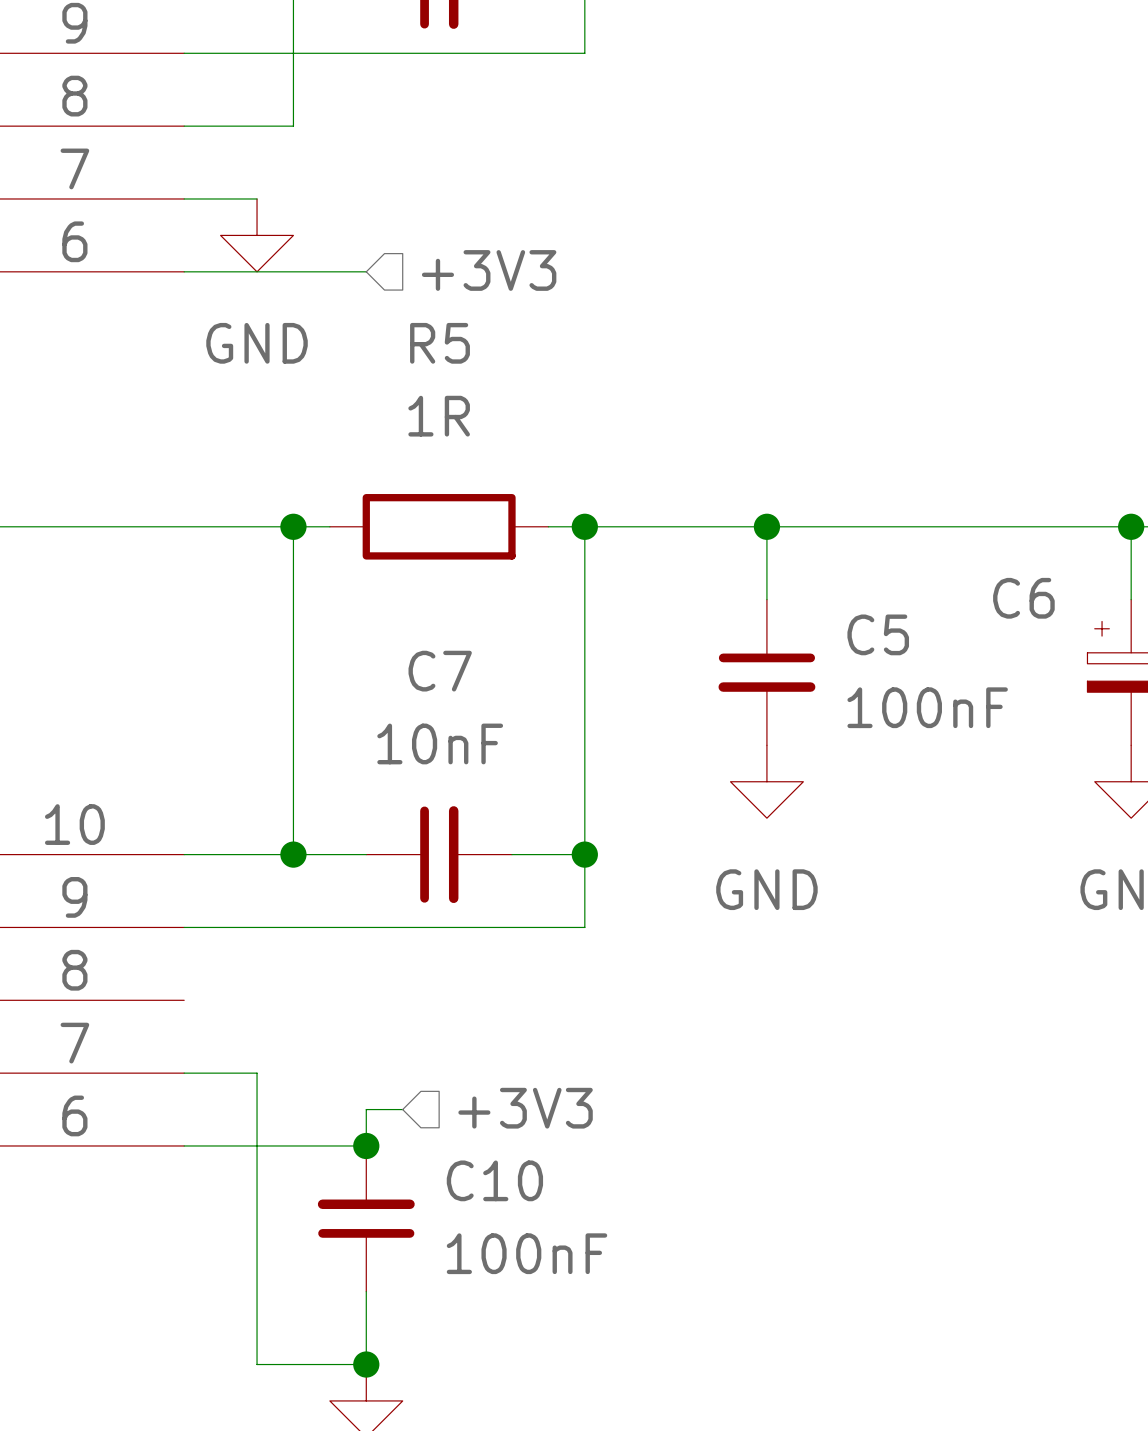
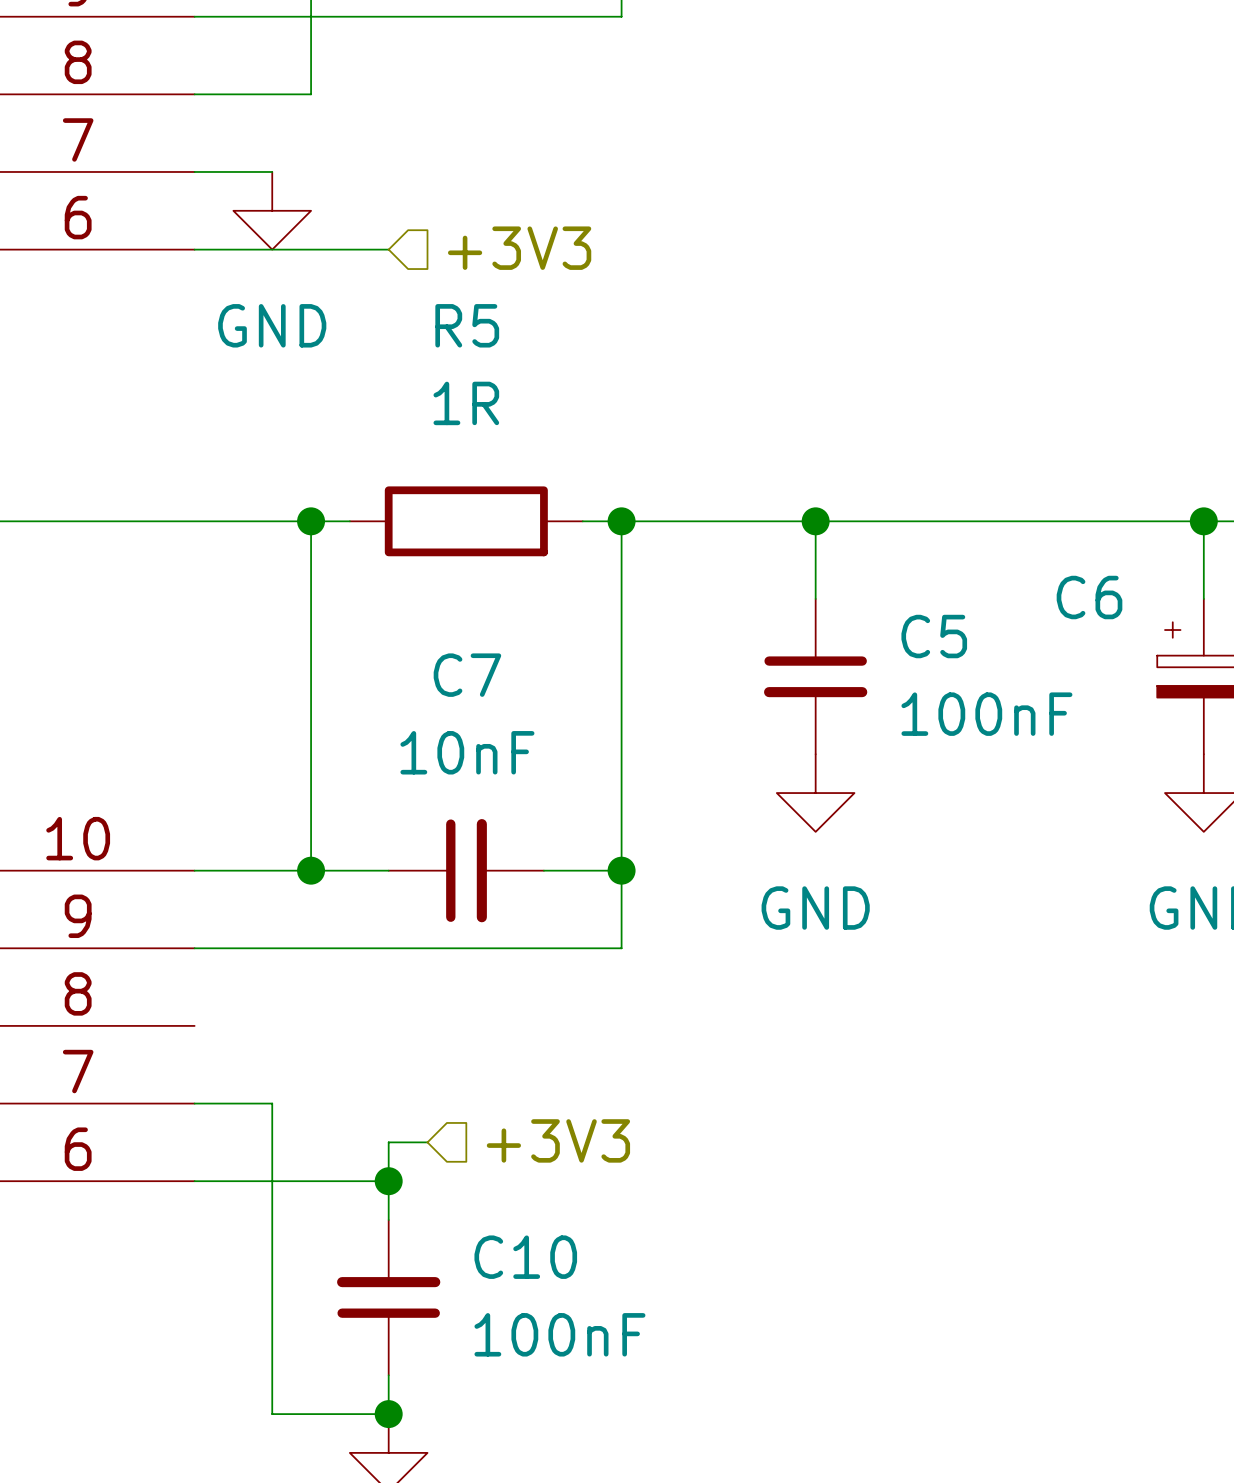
C10 position: (366, 1218) -> (388, 1297)

